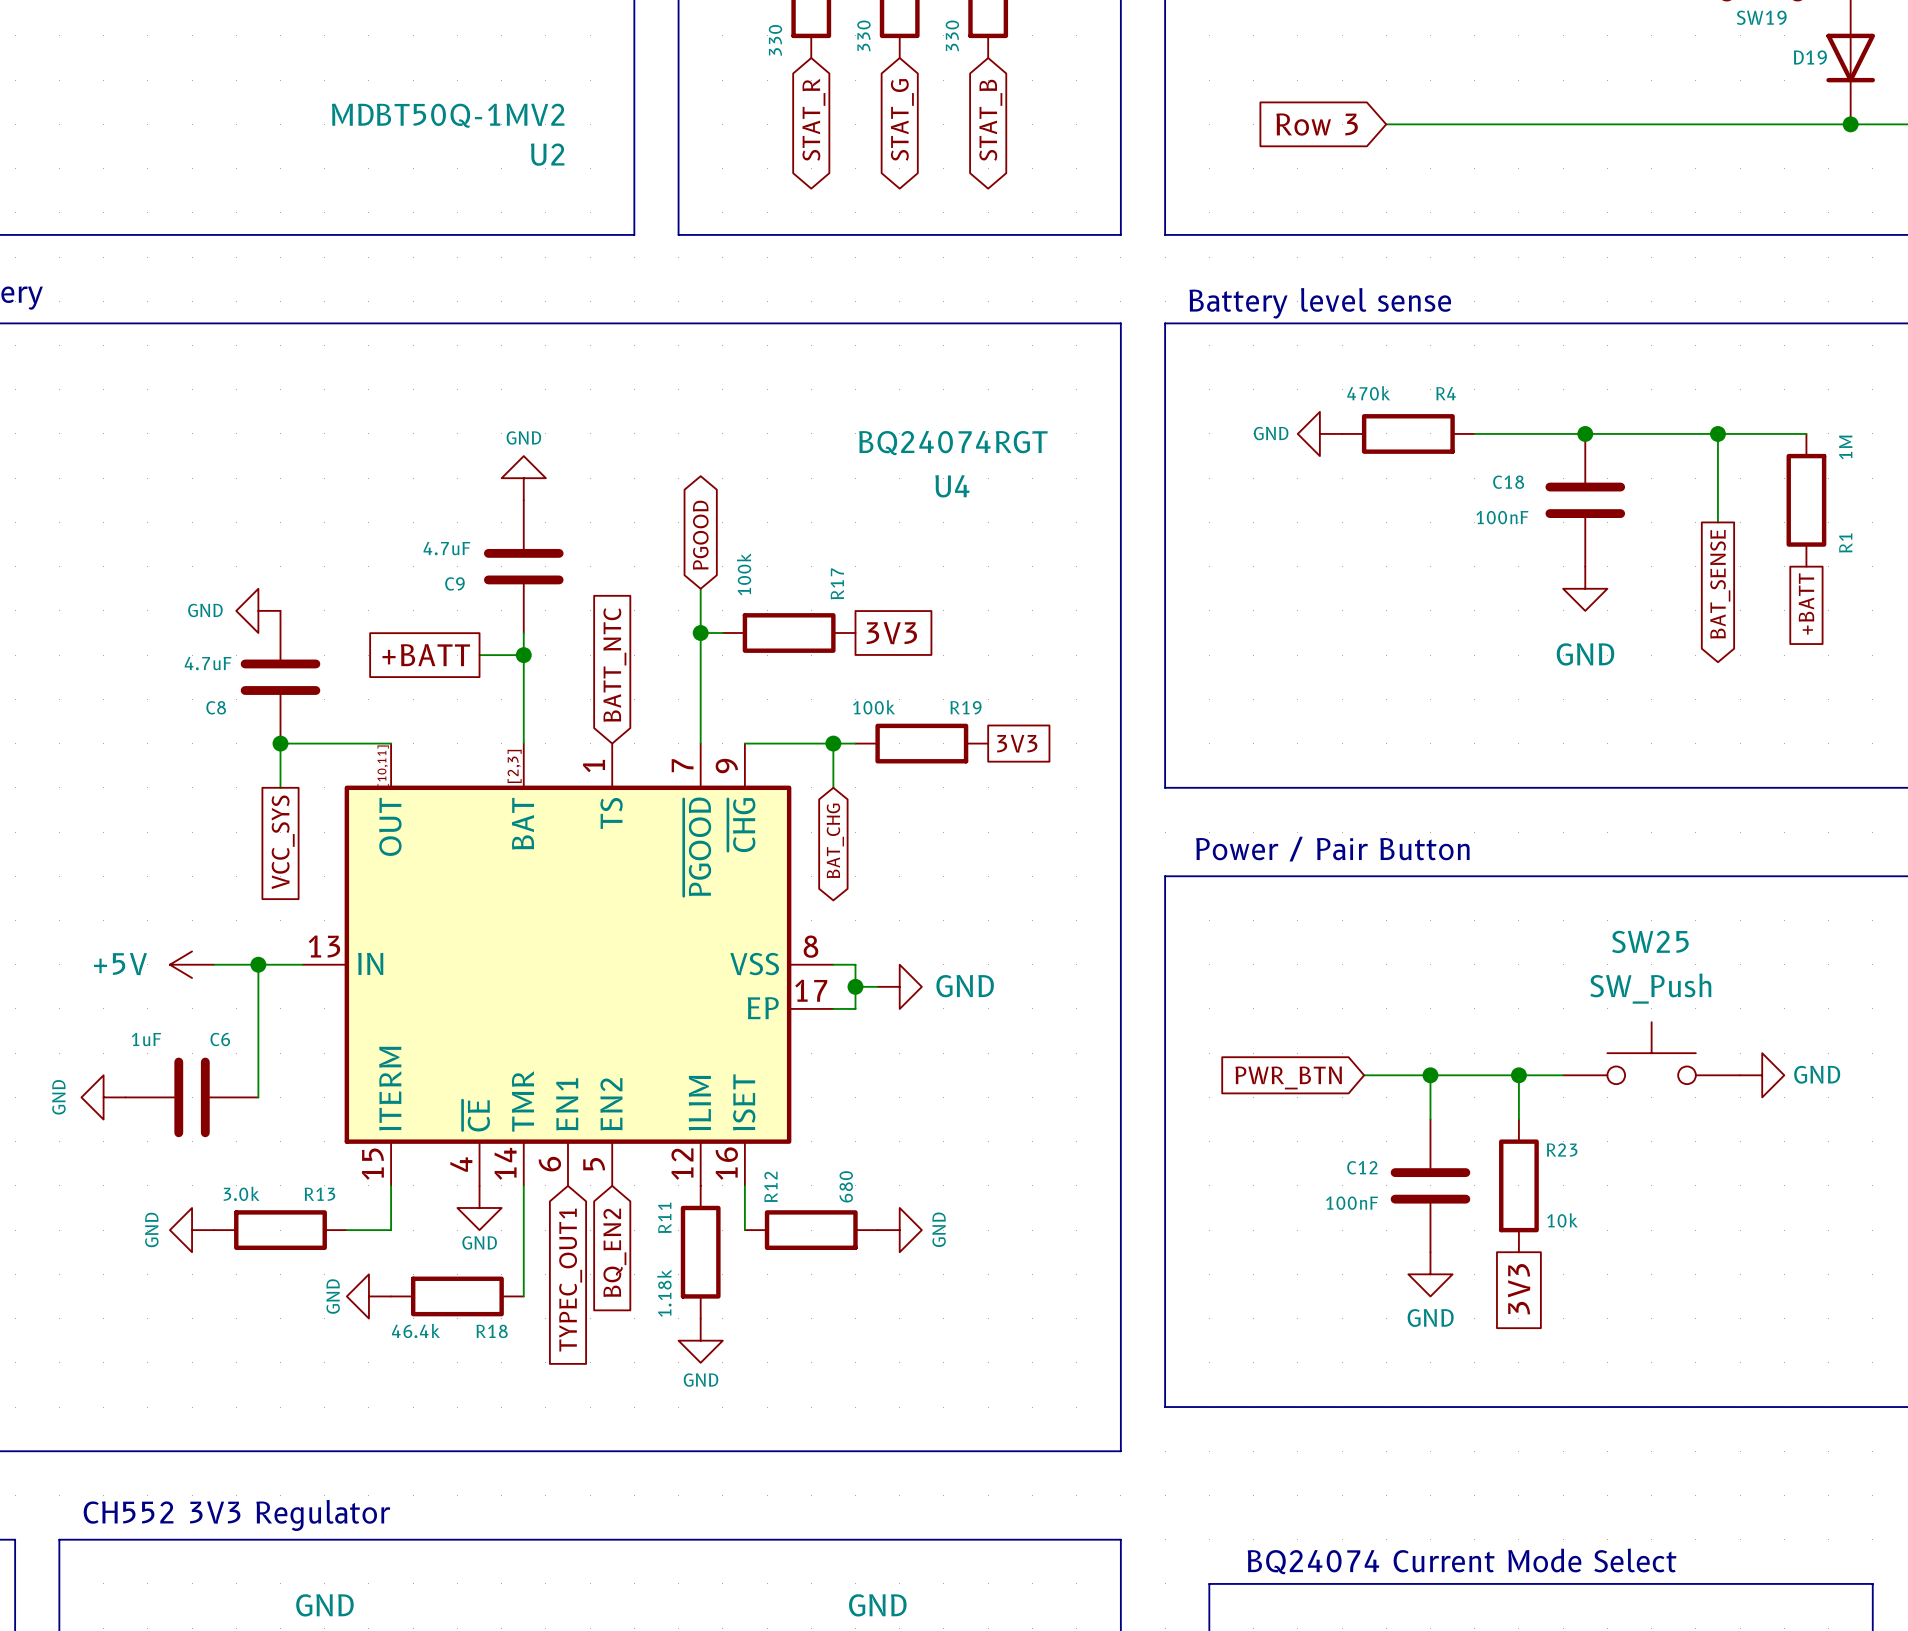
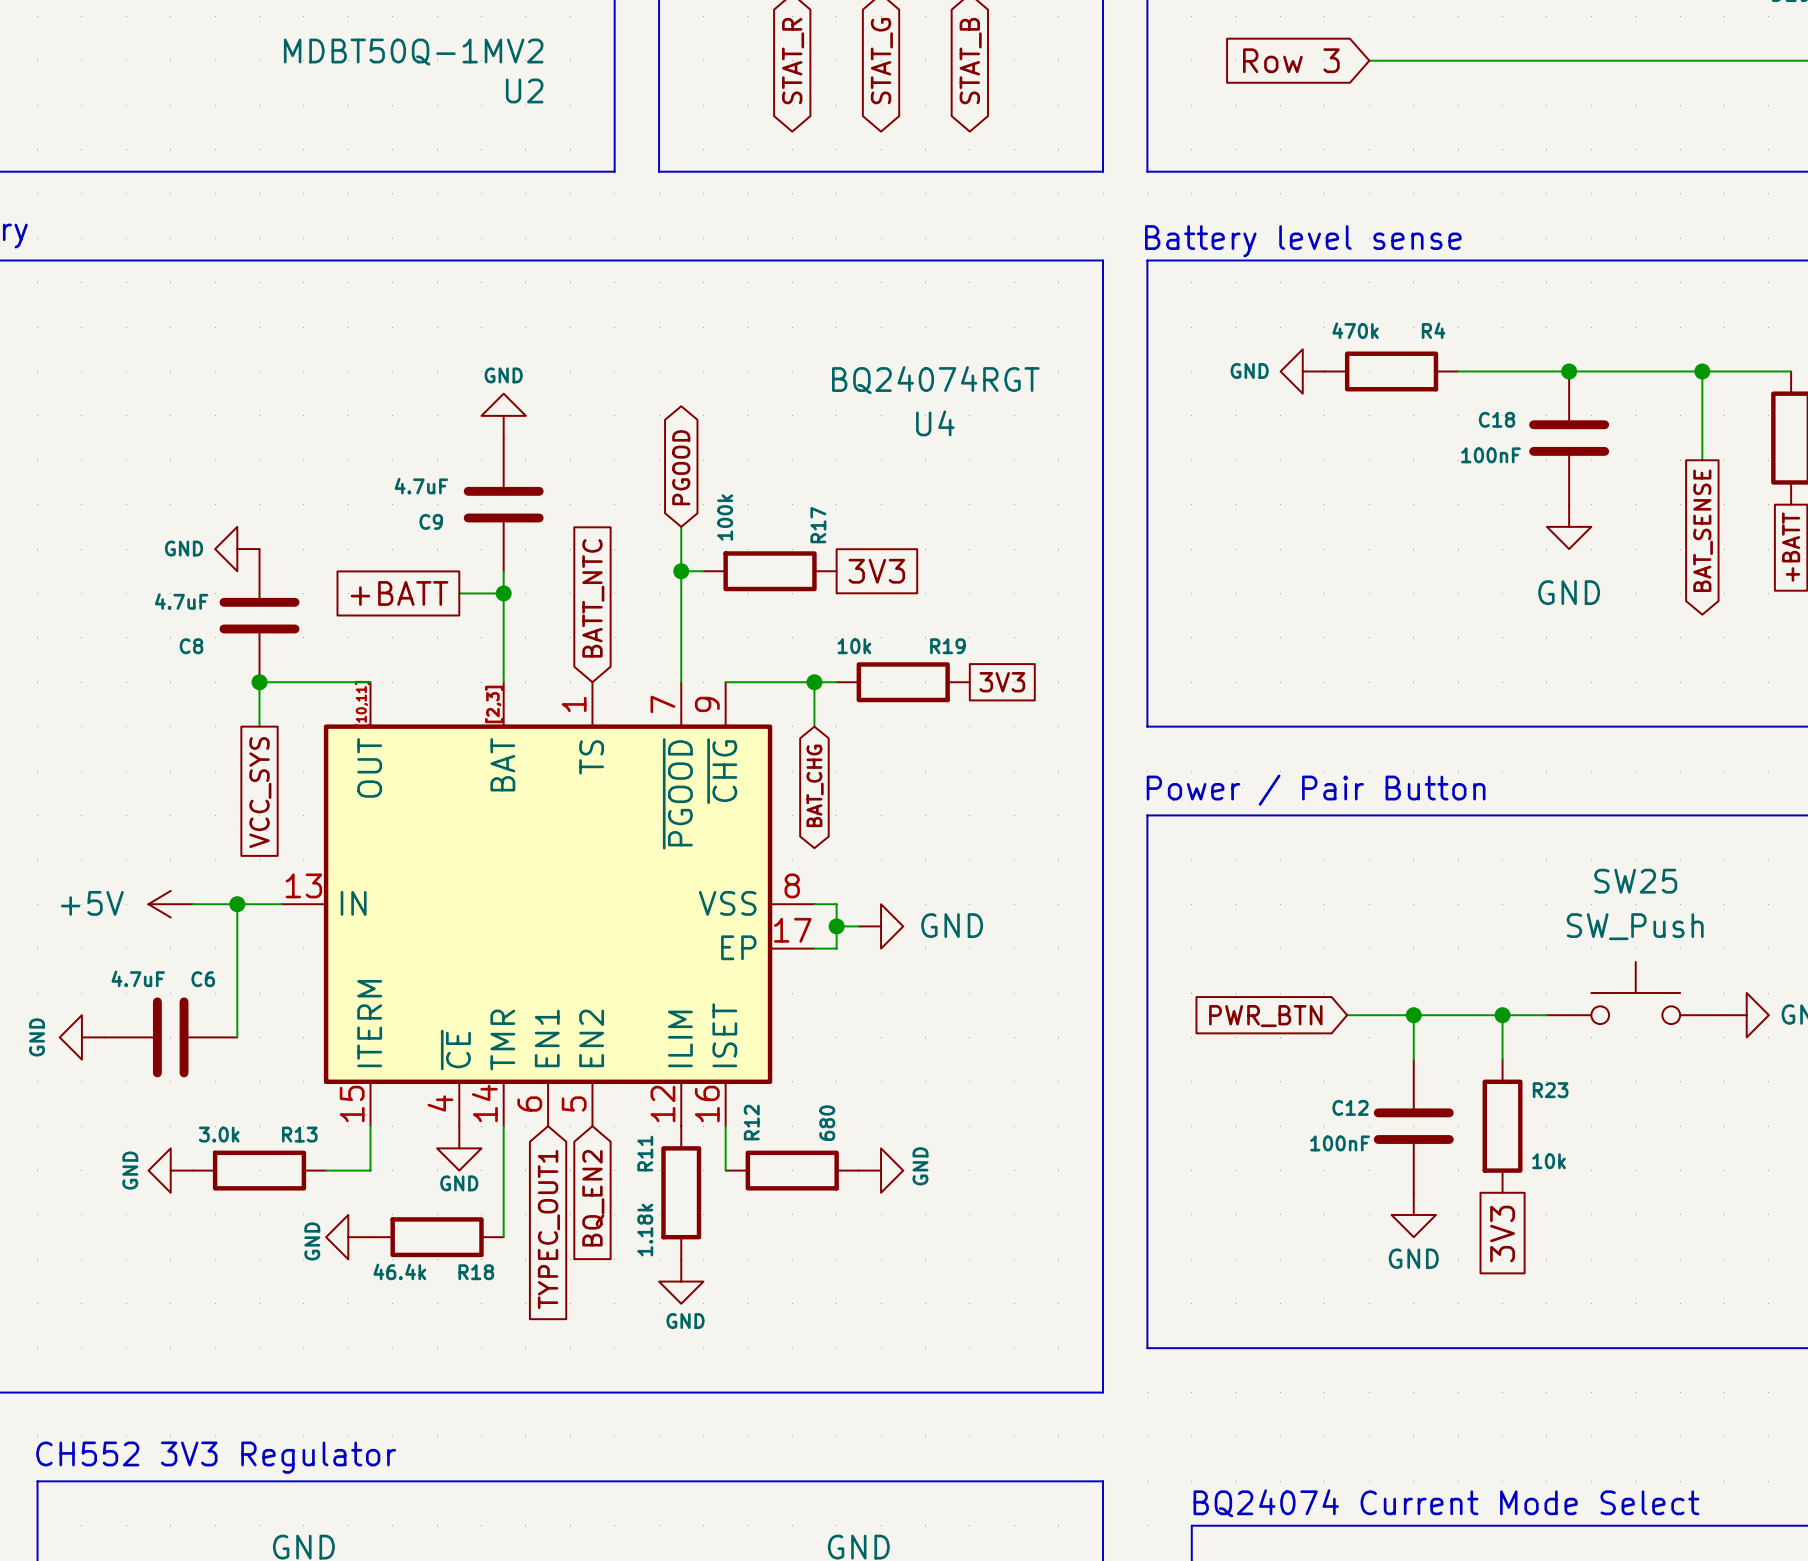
R19 value: 100k (874, 707) -> 10k (854, 646)
C6 value: 1uF (146, 1039) -> 4.7uF (138, 978)

